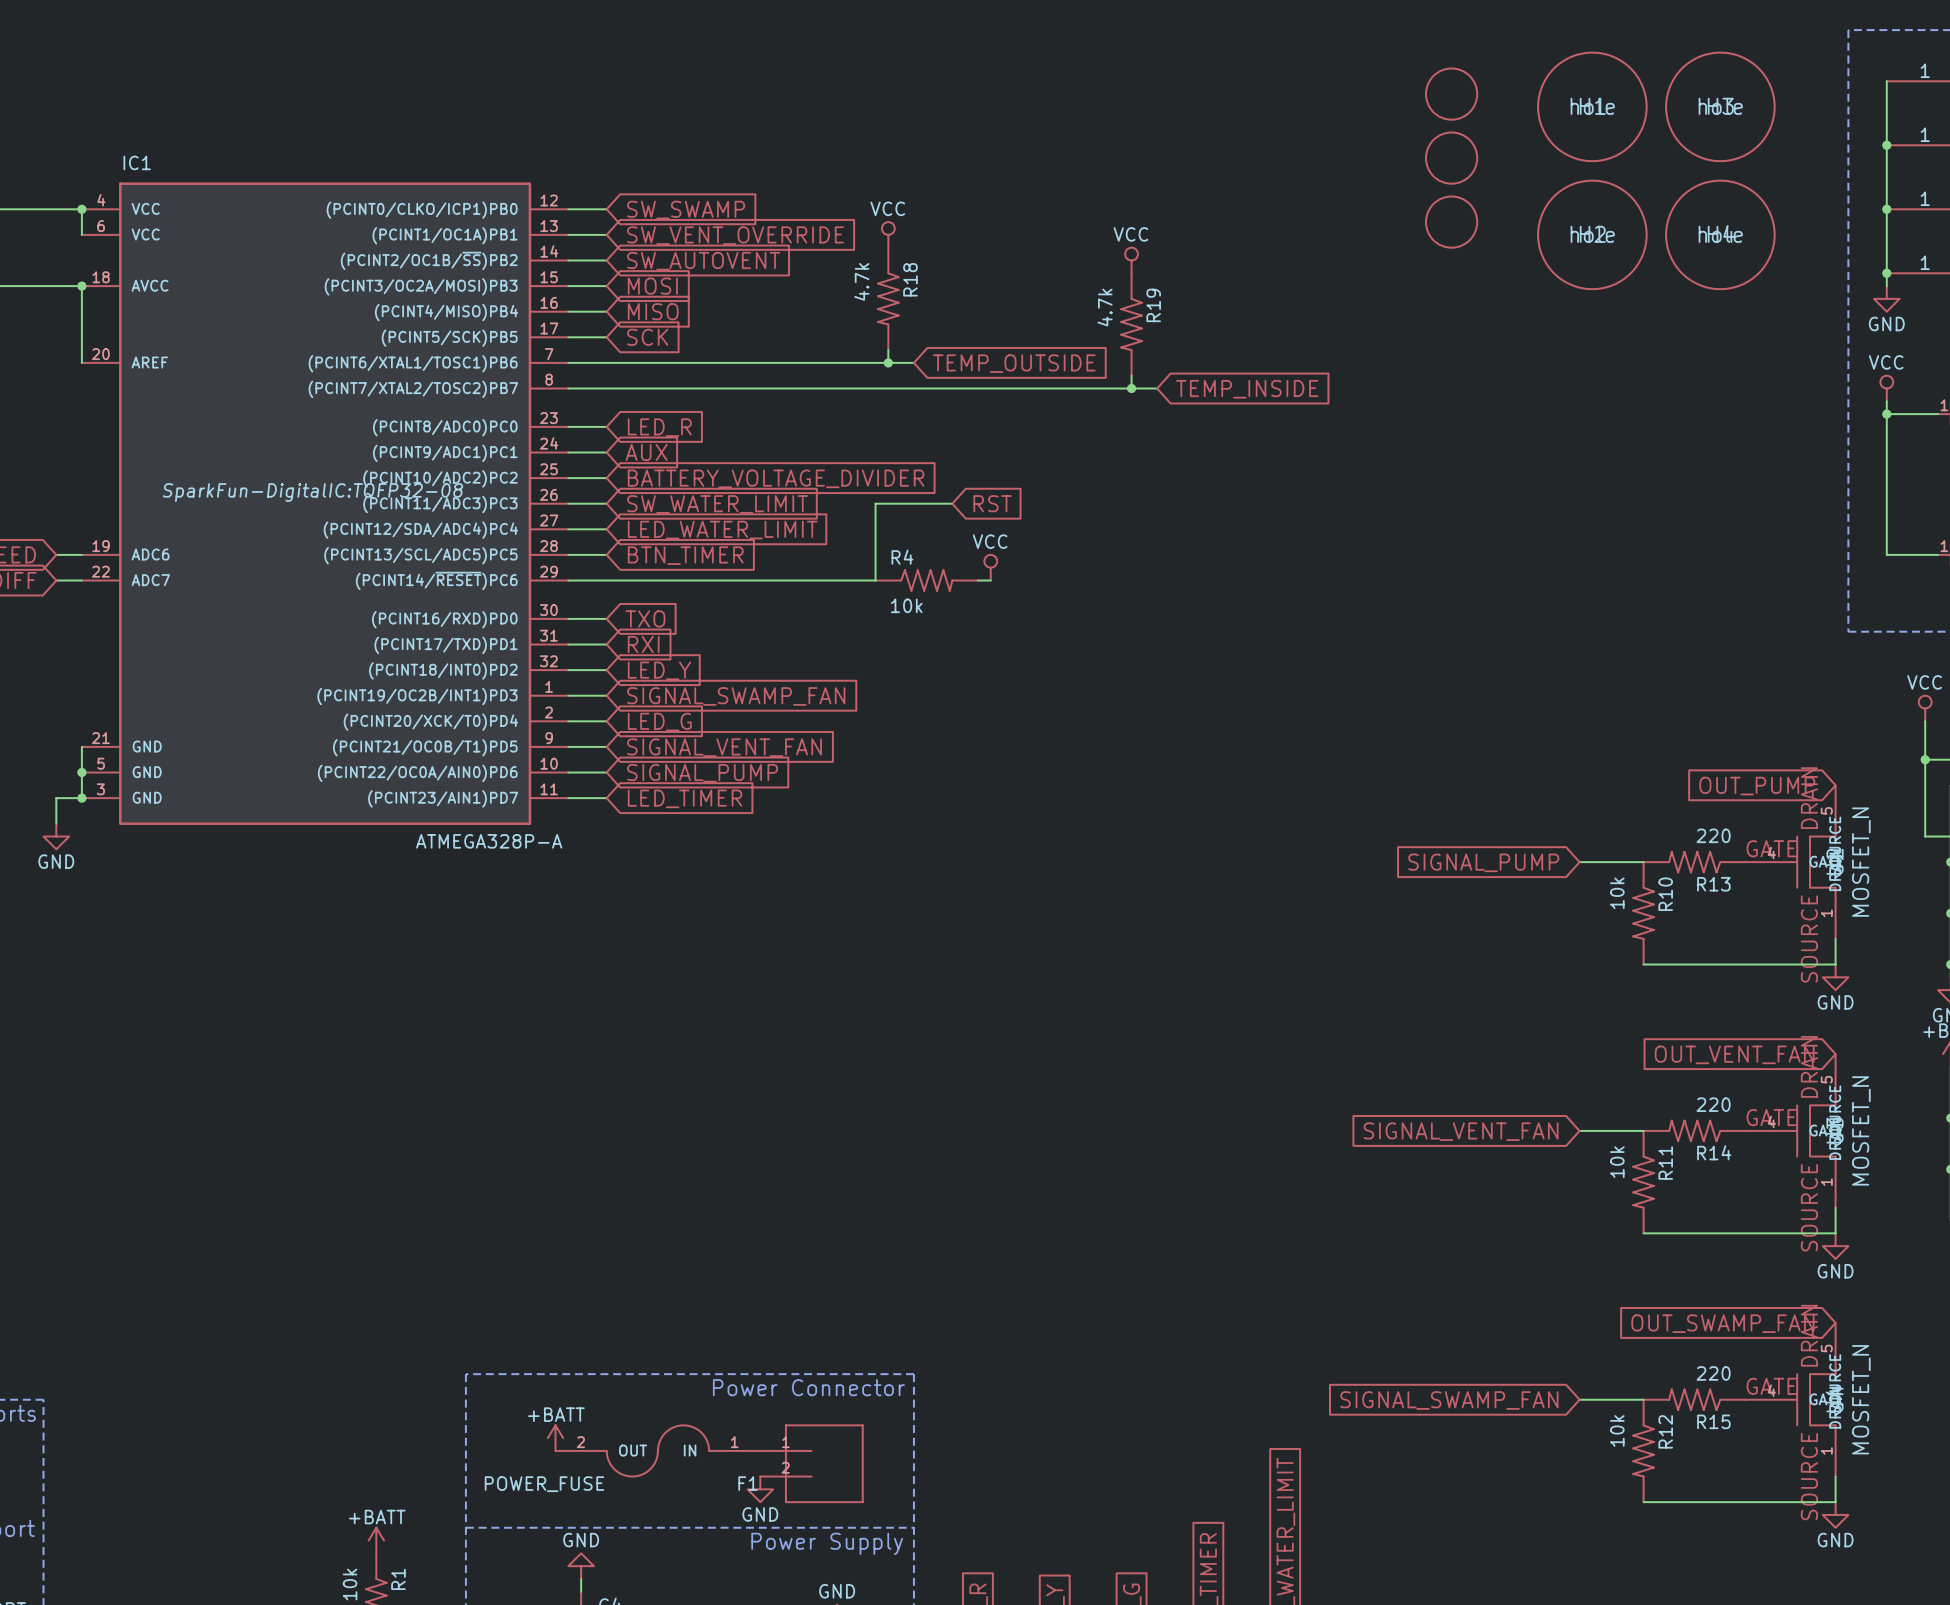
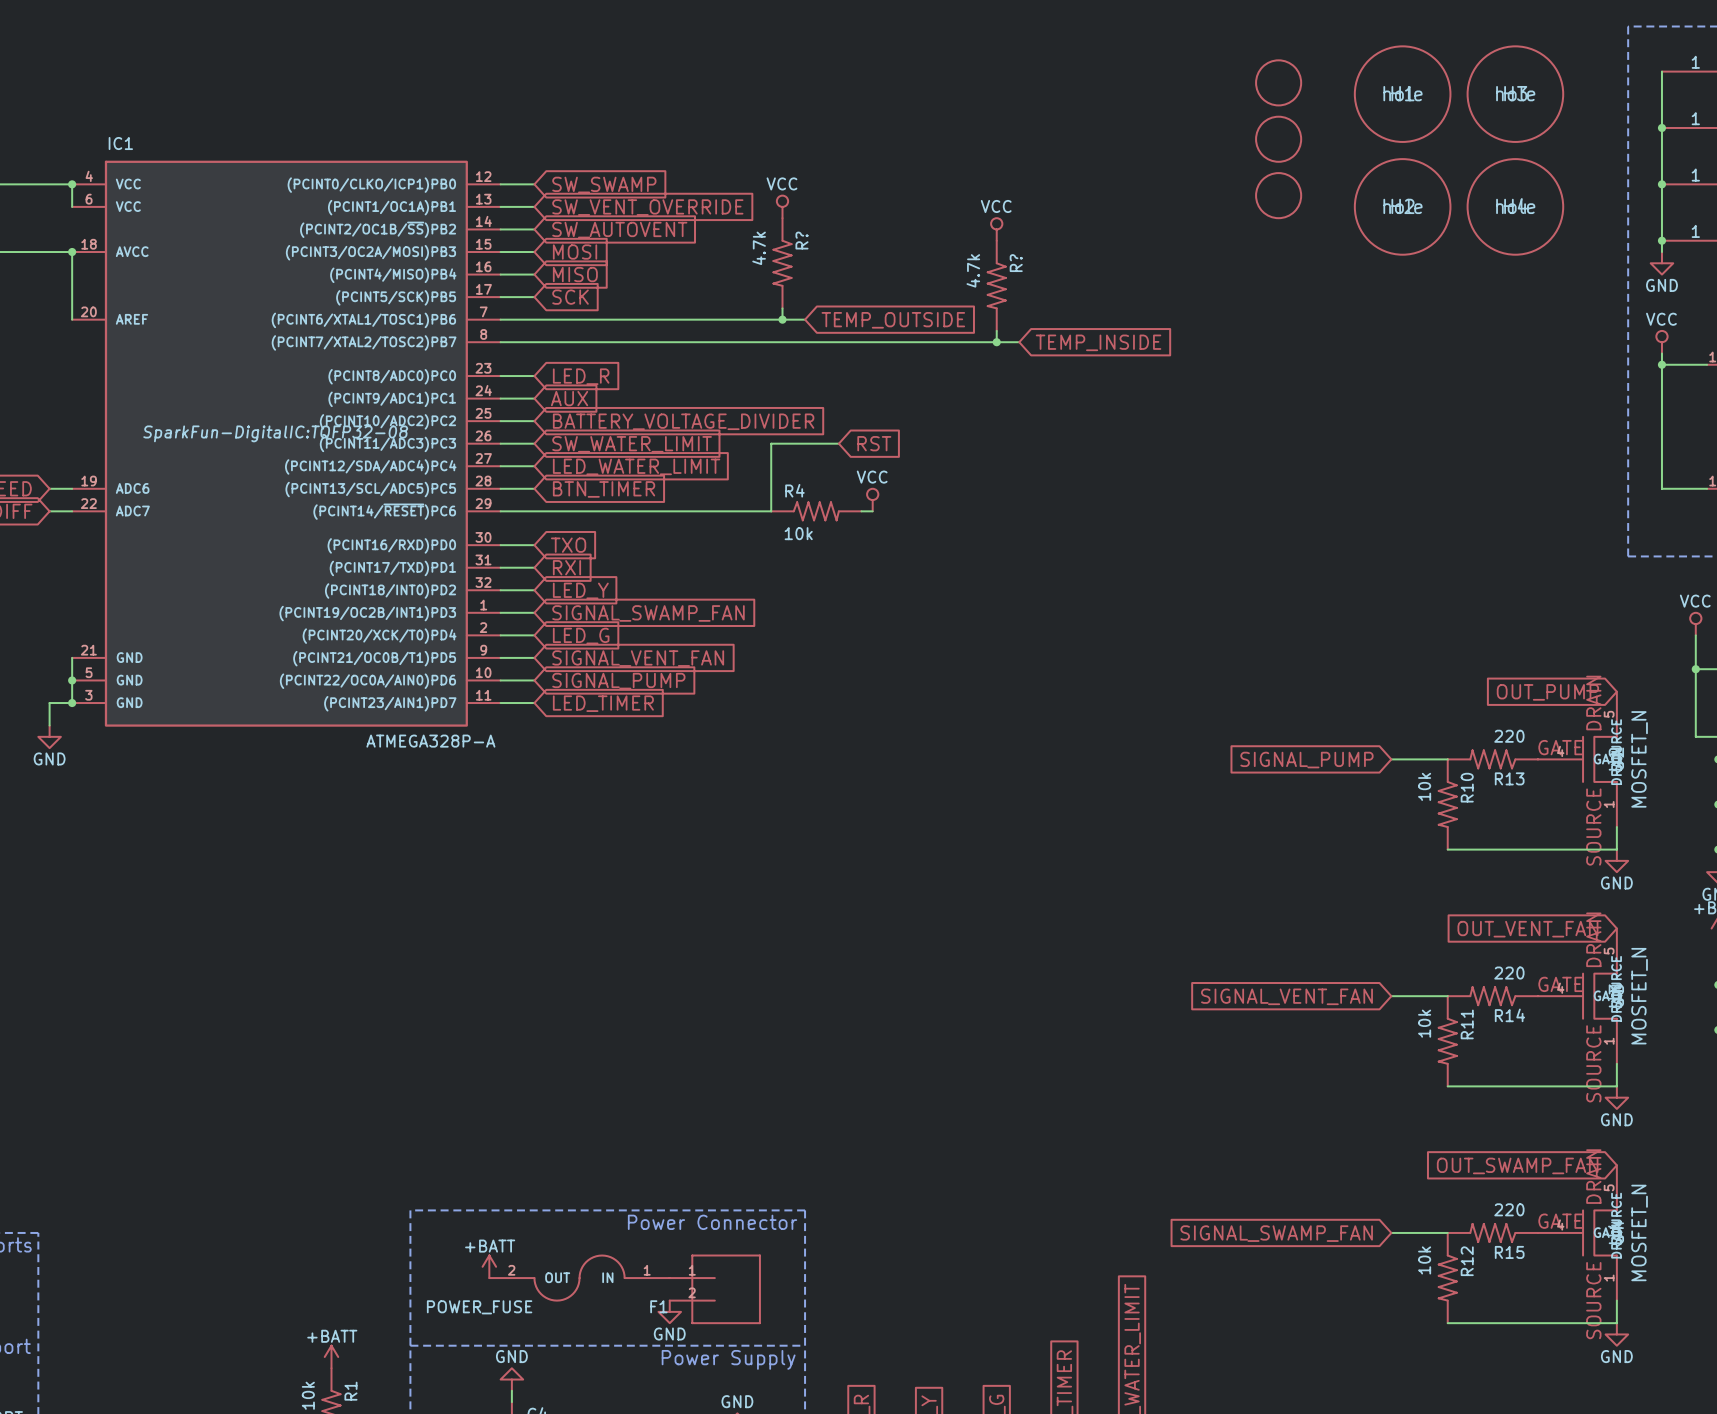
R18 name: R18 (910, 279) -> R? (801, 240)
R19 name: R19 (1153, 305) -> R? (1016, 263)

